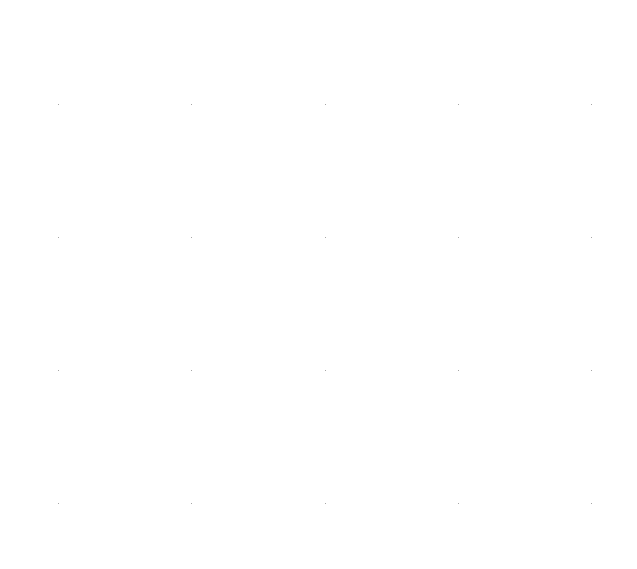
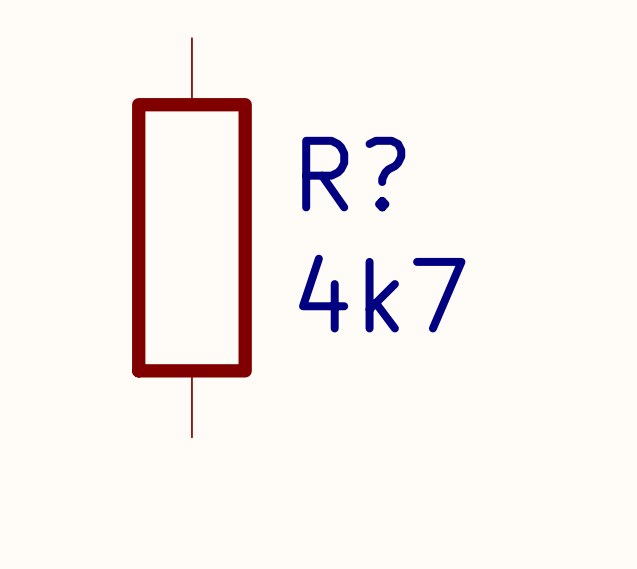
R?: none -> 4k7 (191, 237)

